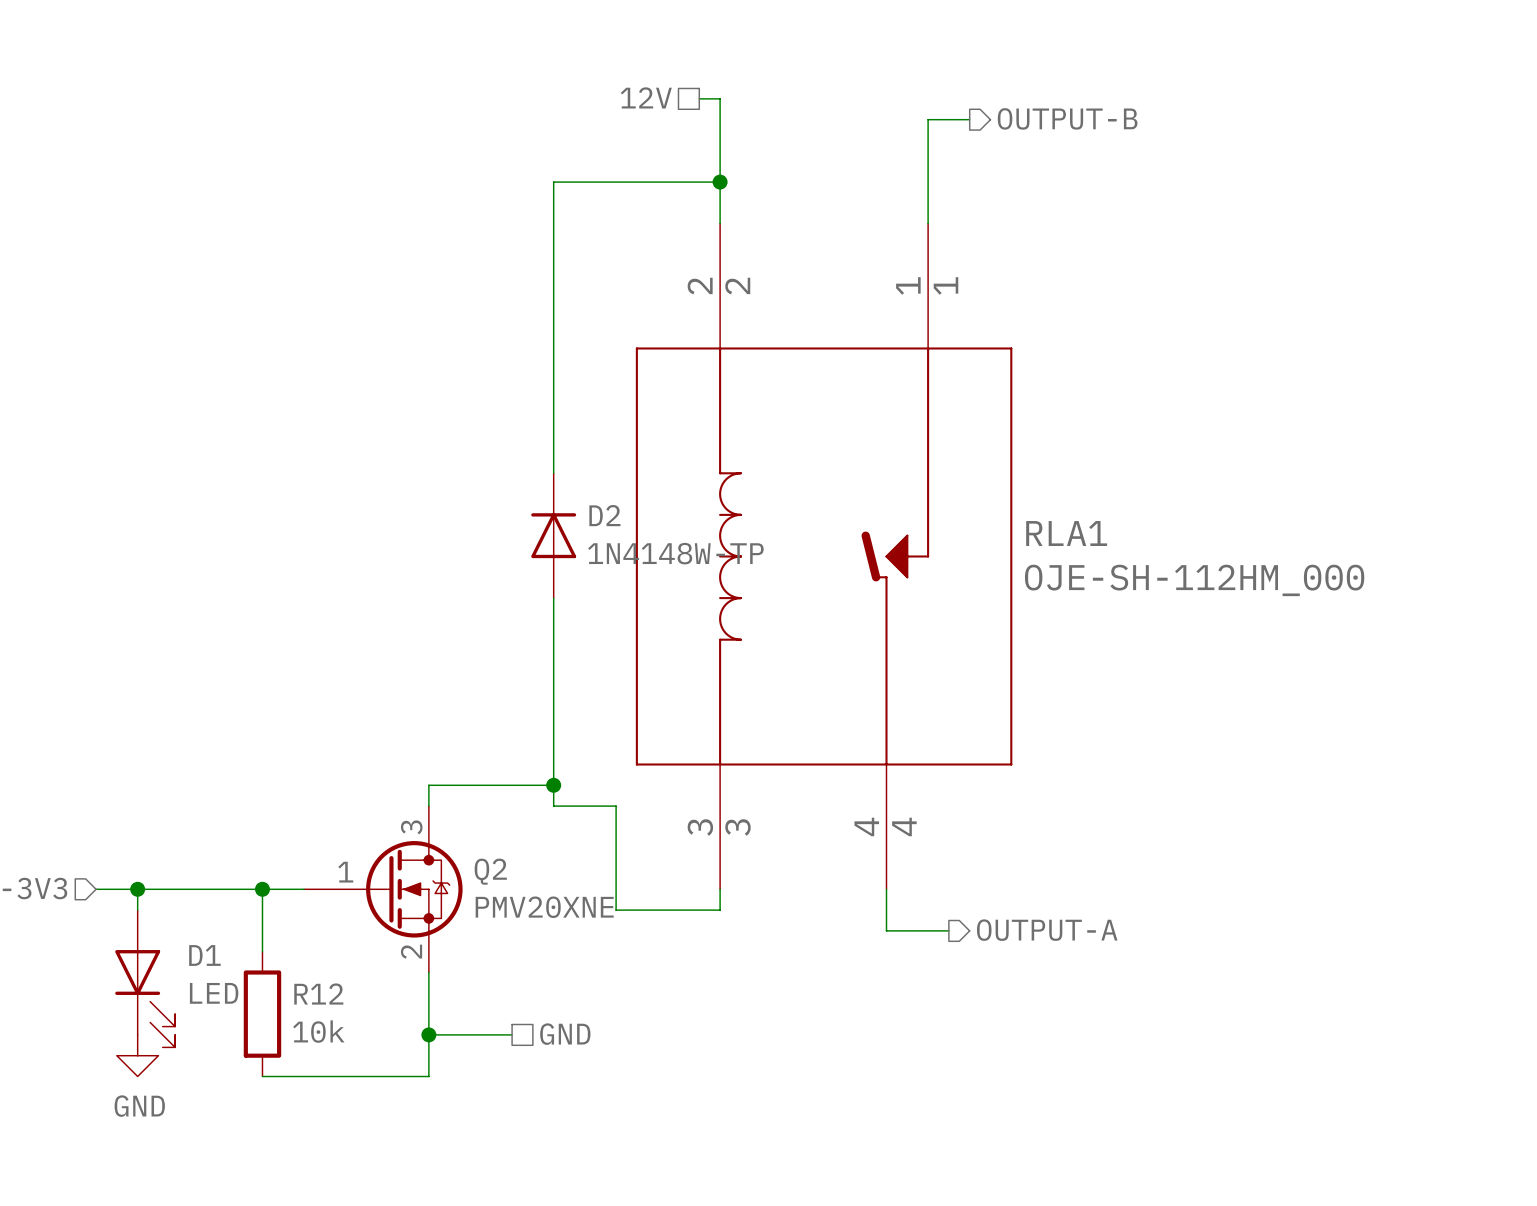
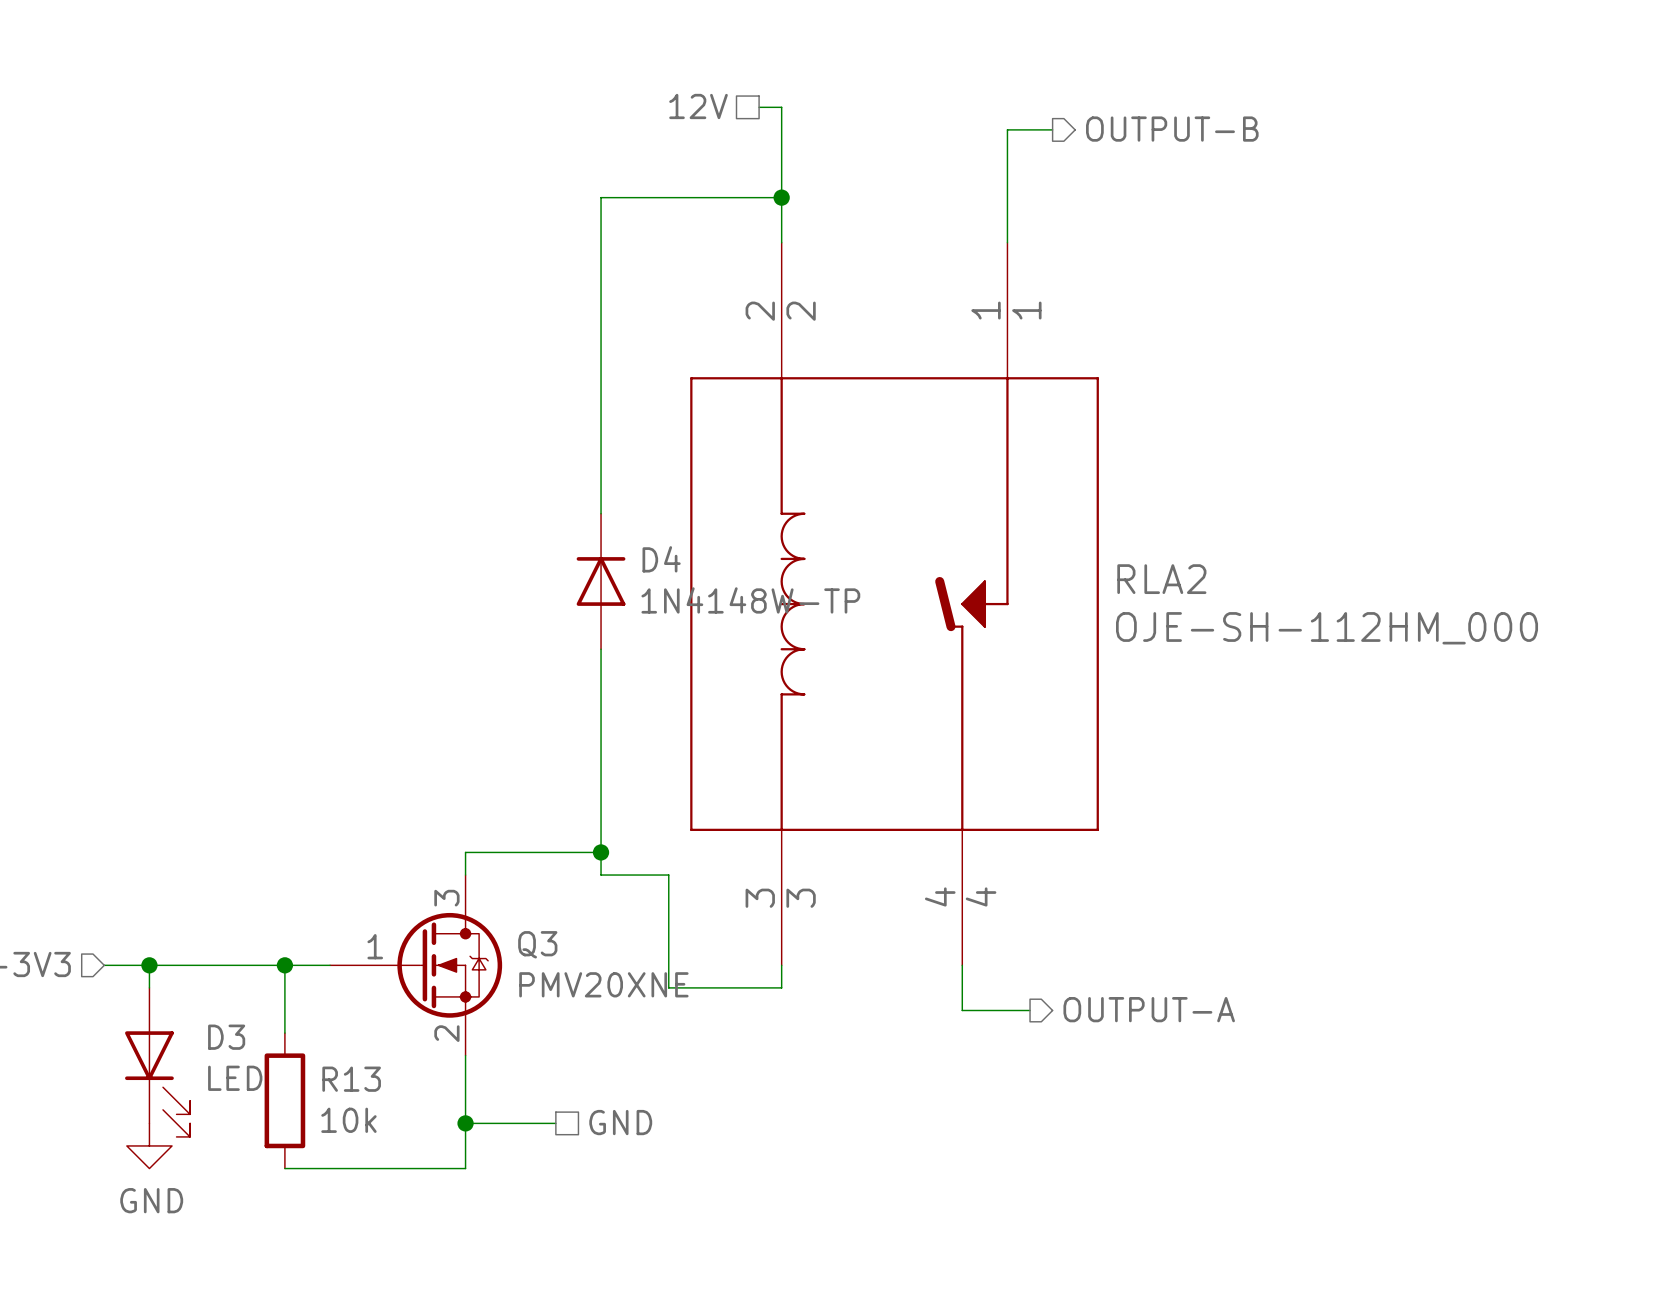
D2 name: D2 (604, 515) -> D4 (661, 559)
RLA1 name: RLA1 (1066, 533) -> RLA2 (1161, 579)
Q2 name: Q2 (490, 871) -> Q3 (537, 944)
D1 name: D1 (204, 955) -> D3 (226, 1037)
R12 name: R12 (318, 994) -> R13 (351, 1079)

